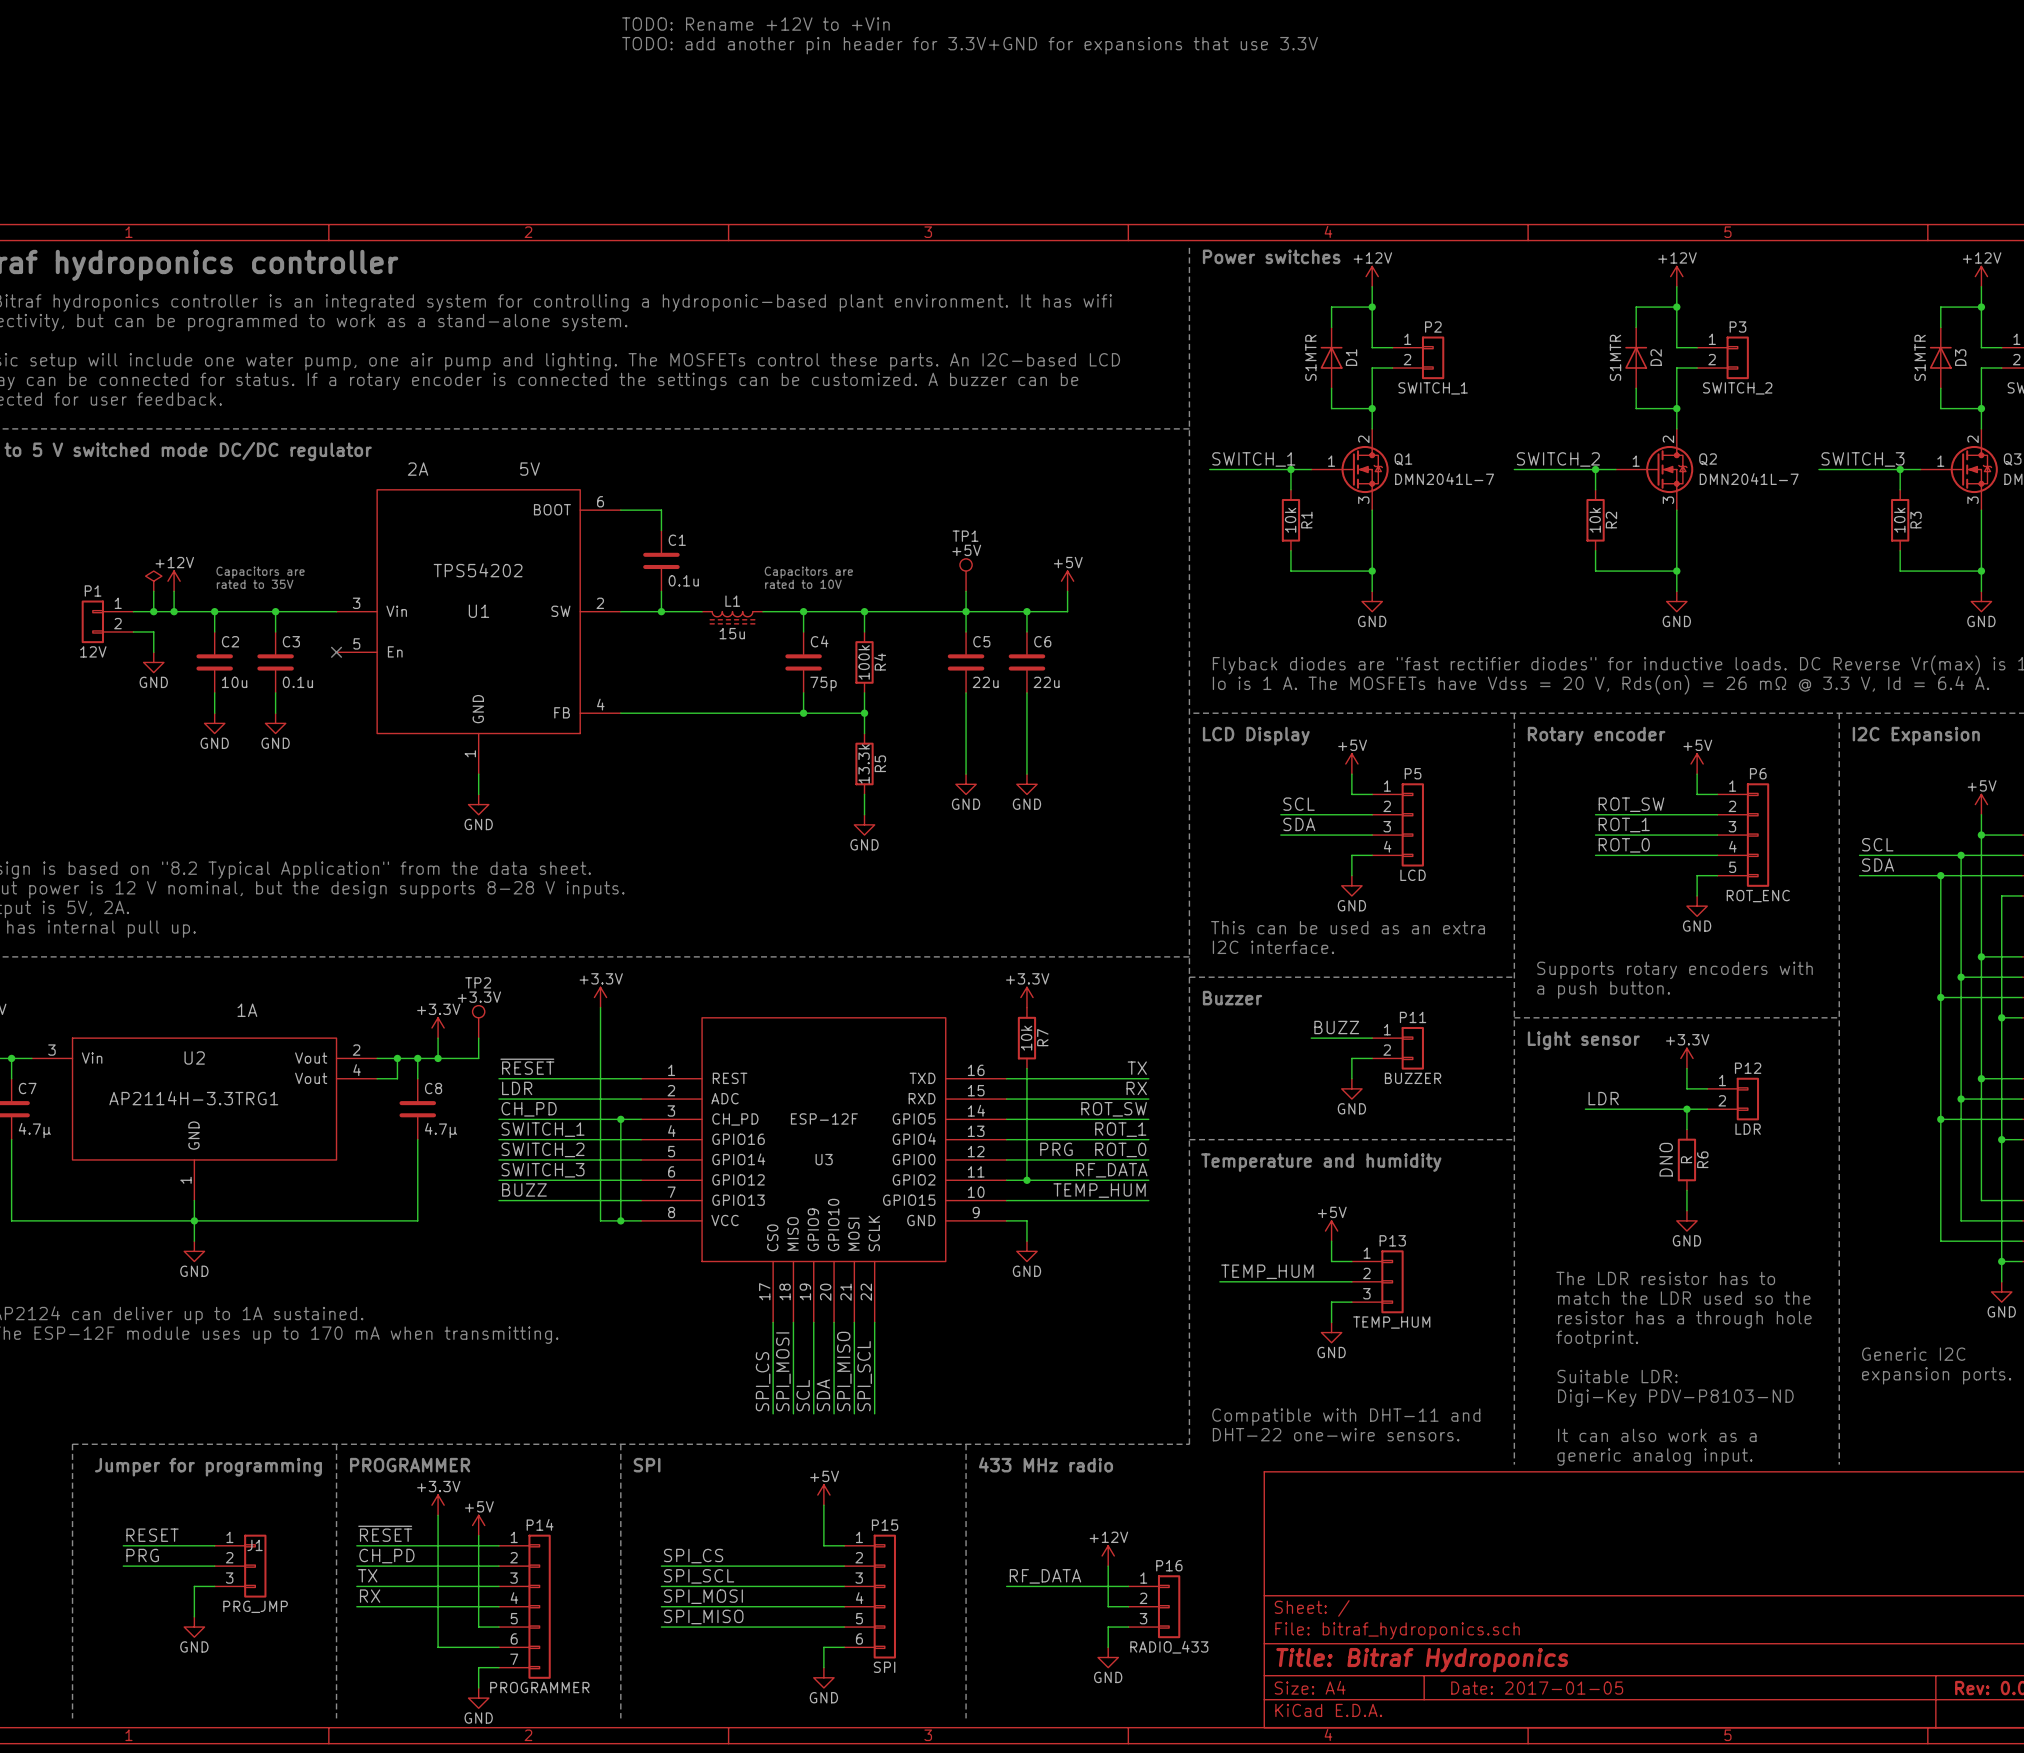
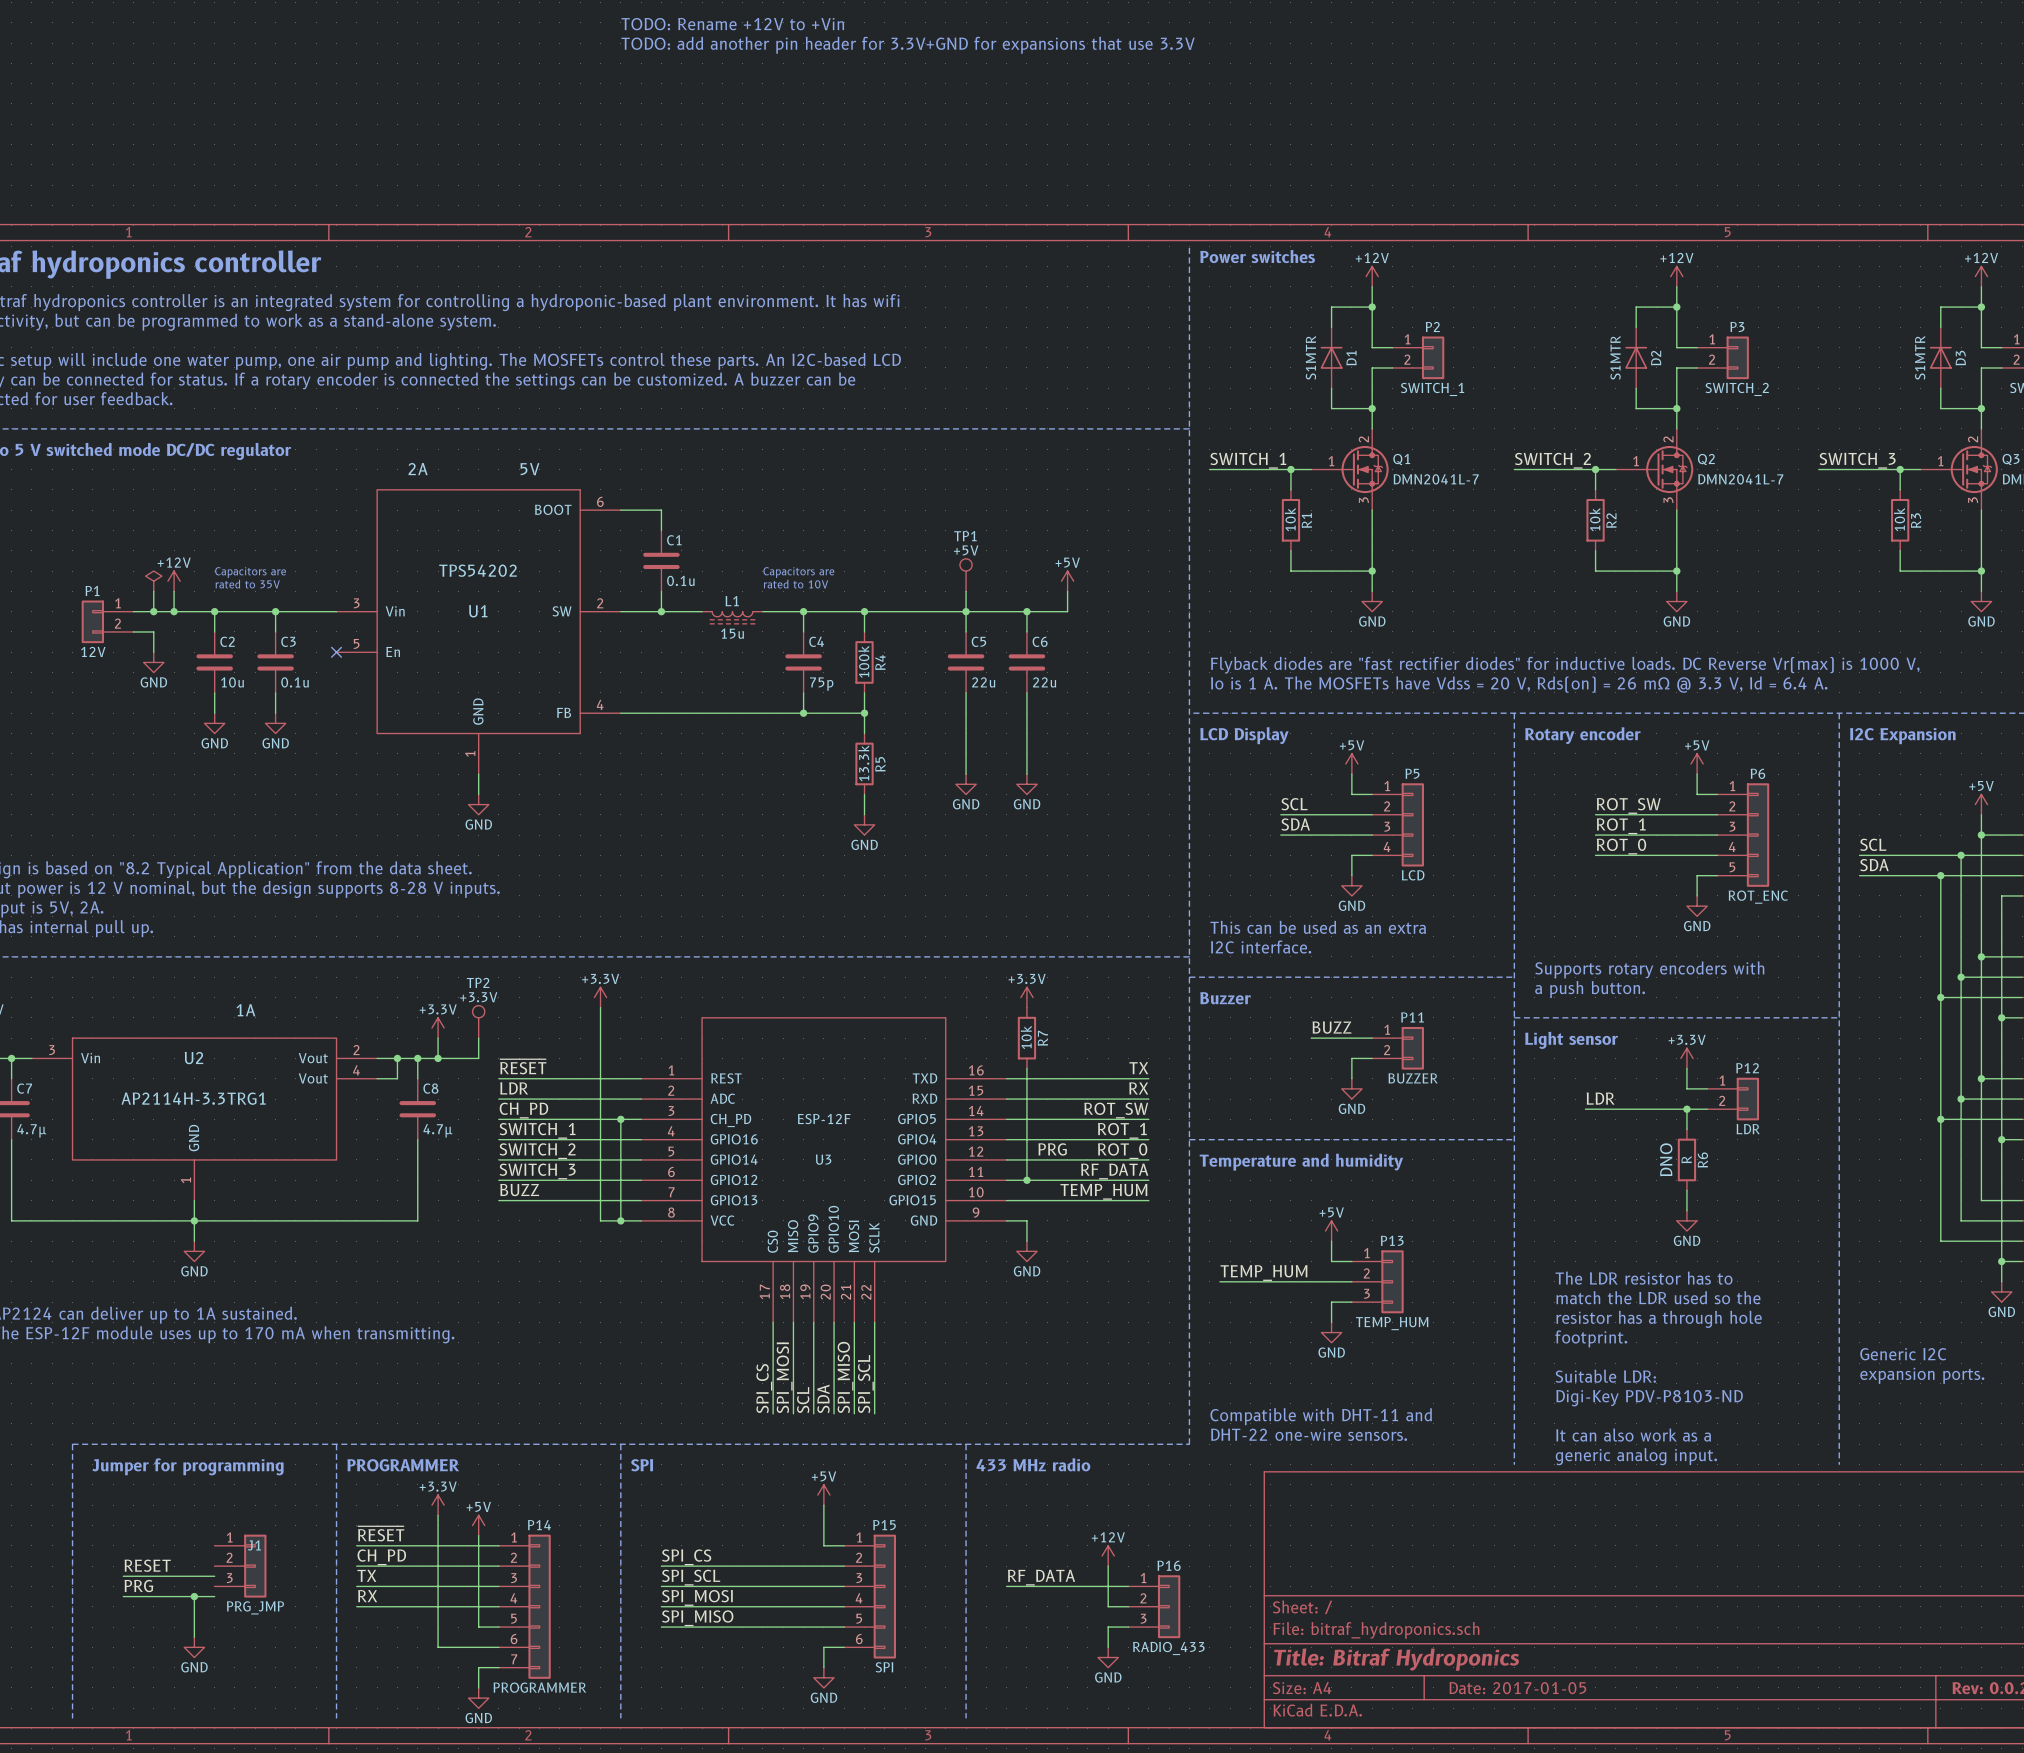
label position: RESET (152, 1535) -> RESET (147, 1565)
wire: (123, 1545) (214, 1545) -> (123, 1576) (214, 1576)
label position: PRG (142, 1555) -> PRG (138, 1586)
wire: (123, 1566) (214, 1566) -> (123, 1596) (214, 1596)
wire: (214, 1586) (194, 1586) (194, 1596) -> none
junction: none -> (194, 1596)
power symbol position: GND (194, 1627) -> GND (194, 1647)

